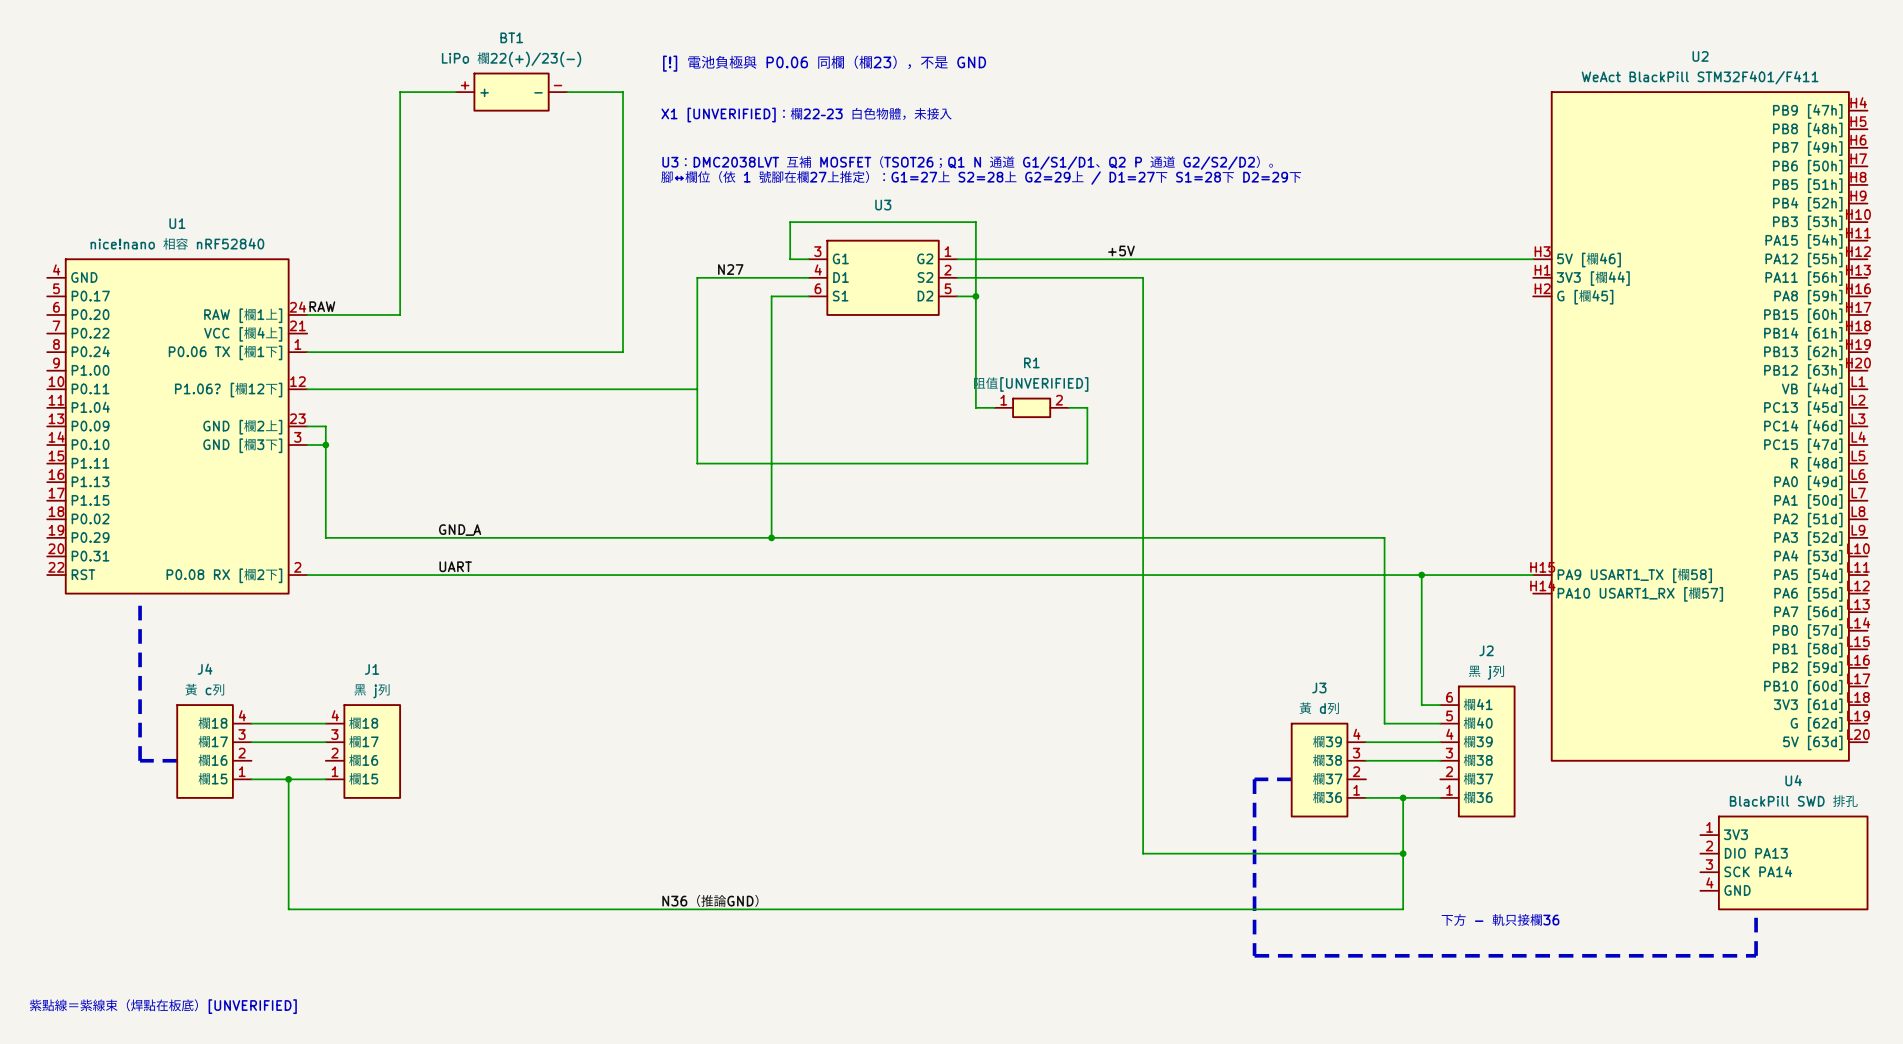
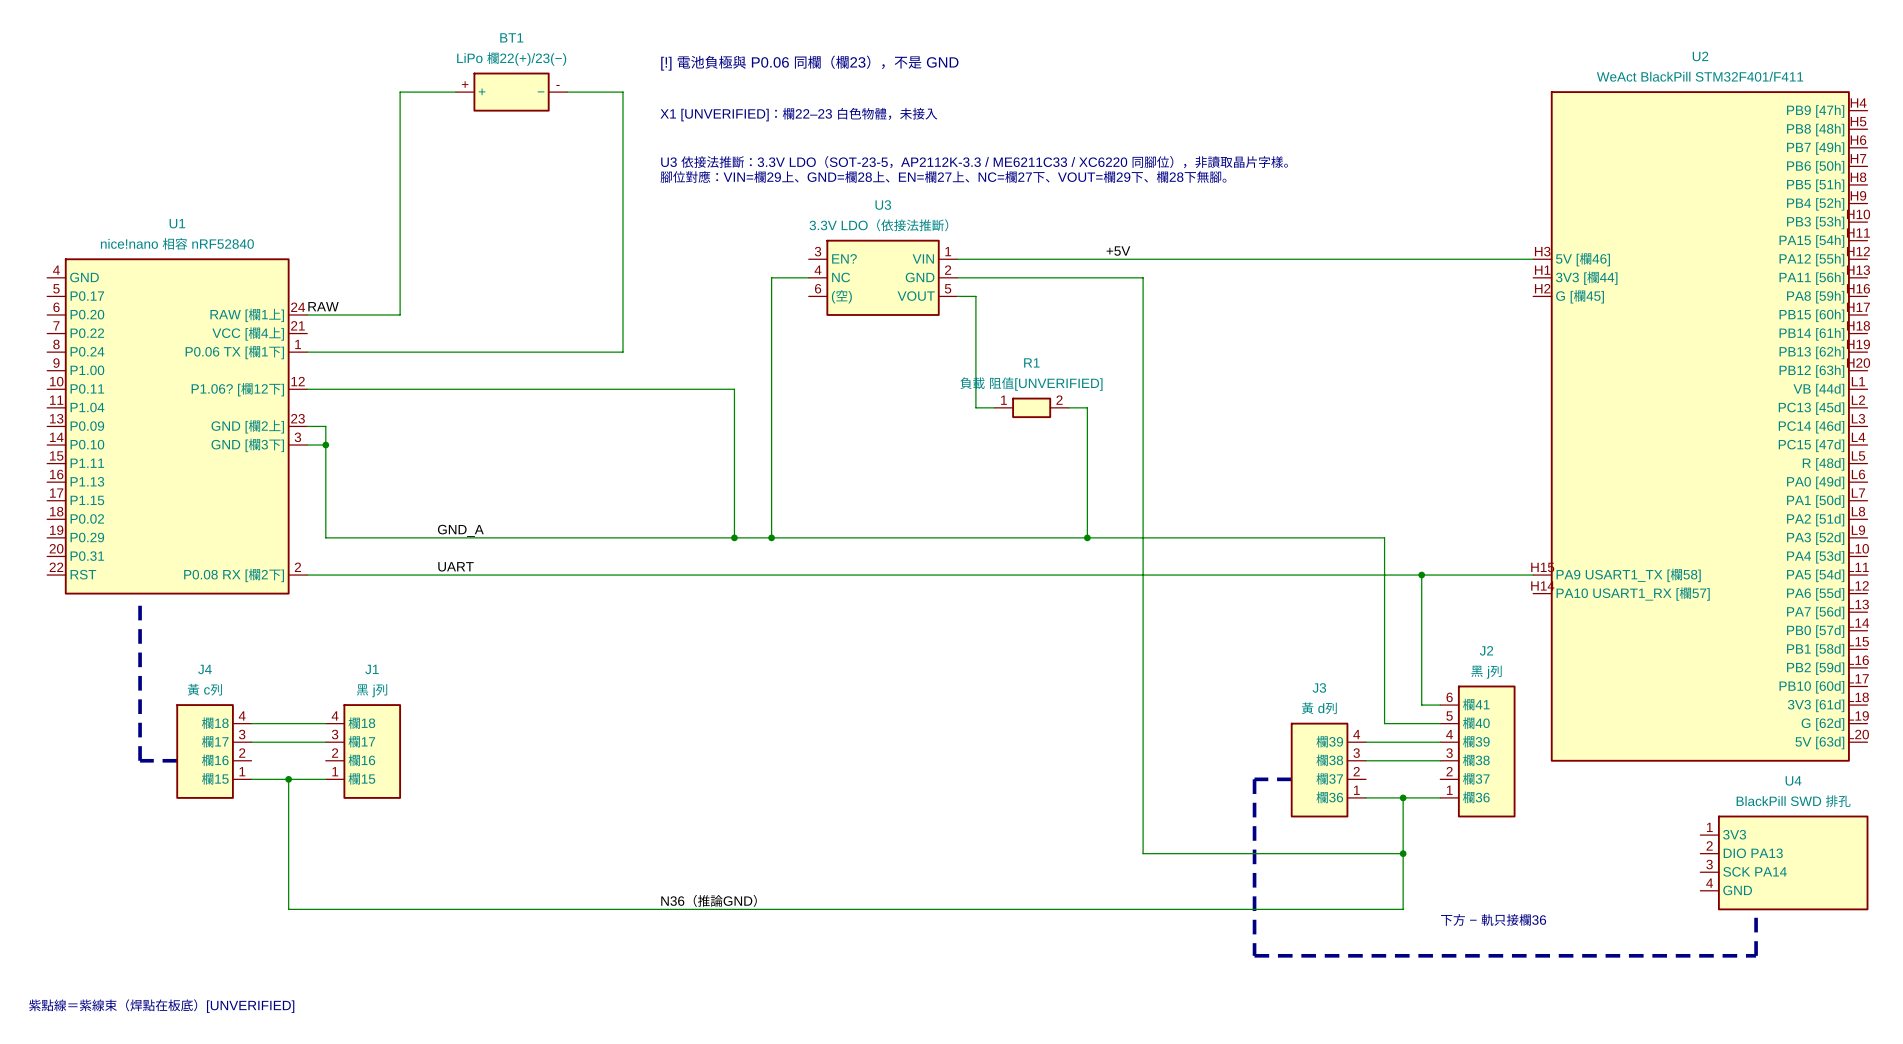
text: U3：DMC2038LVT 互補 MOSFET（TSOT26；Q1 N 通道 G1/S1/D1、Q2 P 通道 G2/S2/D2）。 (968, 162) -> U3 依接法推斷：3.3V LDO（SOT-23-5，AP2112K-3.3 / ME6211C33 / XC6220 同腳位），非讀取晶片字樣。 (974, 162)
text: 腳↔欄位（依 1 號腳在欄27上推定）：G1=27上 S2=28上 G2=29上 / D1=27下 S1=28下 D2=29下 (981, 177) -> 腳位對應：VIN=欄29上、GND=欄28上、EN=欄27上、NC=欄27下、VOUT=欄29下、欄28下無腳。 (943, 177)
U3 value: none -> 3.3V LDO（依接法推斷） (878, 225)
U3 pin name: G1 (840, 258) -> EN? (844, 258)
U3 pin name: G2 (925, 258) -> VIN (923, 258)
wire: (808, 259) (790, 259) (790, 222) (975, 222) (975, 296) -> none
label: N27 (730, 269) -> none
wire: (771, 277) (697, 277) (697, 463) (1087, 463) -> (1087, 537) (1087, 463)
U3 pin name: D1 (841, 277) -> NC (841, 277)
U3 pin name: S2 (925, 277) -> GND (920, 277)
wire: (771, 296) (808, 296) -> (771, 296) (771, 277)
U3 pin name: S1 (840, 296) -> (空) (841, 296)
U3 pin name: D2 (925, 296) -> VOUT (916, 296)
junction: (975, 296) -> none
R1 value: 阻值[UNVERIFIED] (1030, 384) -> 負載 阻值[UNVERIFIED] (1031, 384)
wire: none -> (697, 389) (734, 389) (734, 537)
junction: none -> (734, 537)
junction: none -> (1087, 537)

